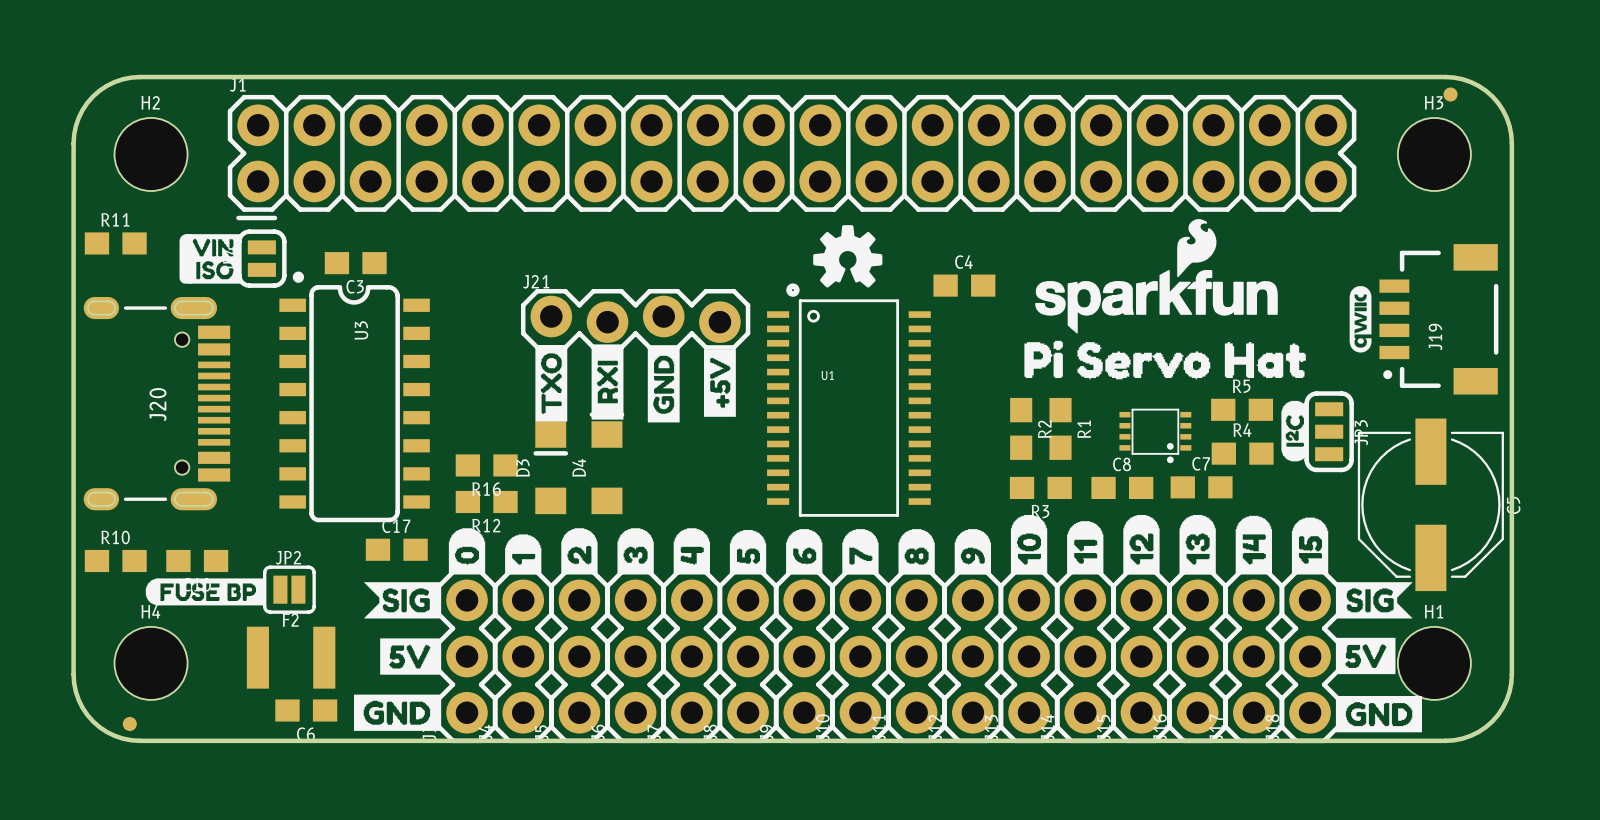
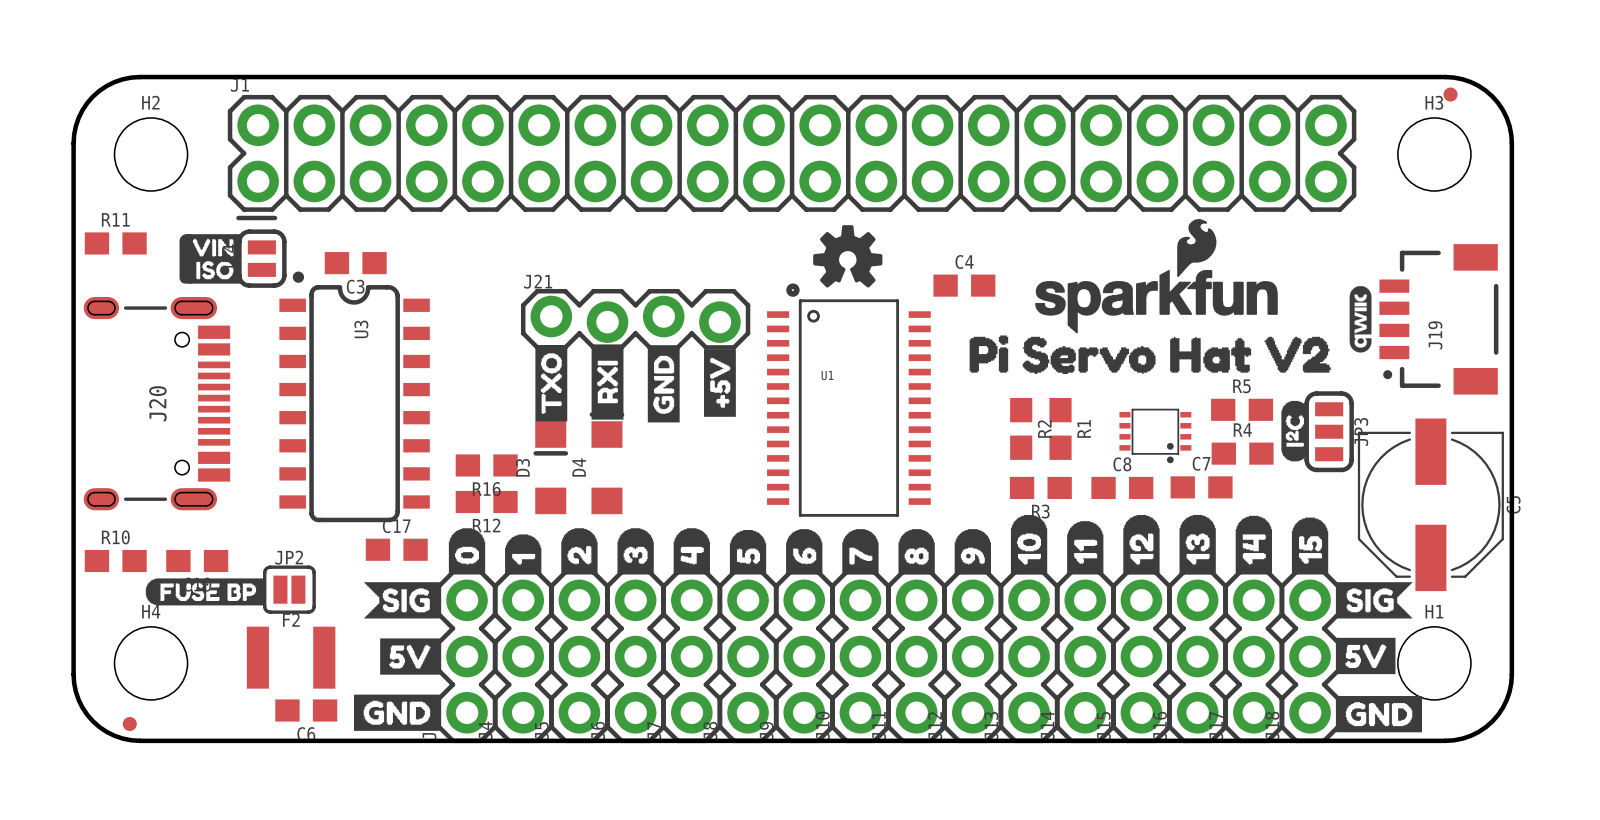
drawing shape: [1024, 340, 1306, 380] -> [969, 335, 1331, 374]

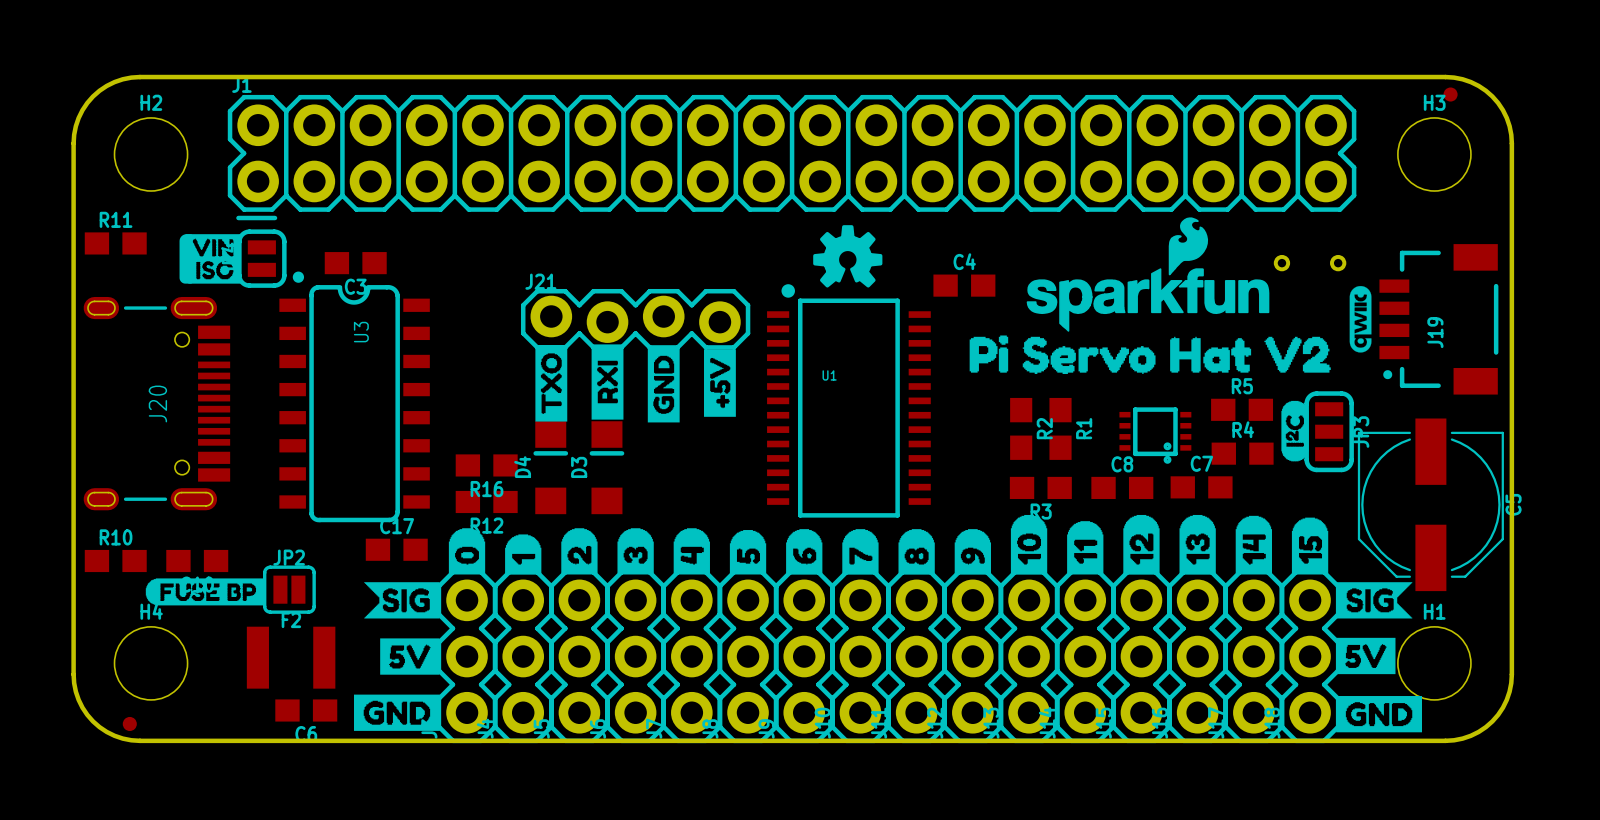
drawing shape: [1035, 219, 1278, 334] -> [1026, 217, 1270, 332]
part: none -> (1281, 263)
part: none -> (1338, 263)
drawing: [786, 283, 800, 297] -> none
U1 footprint: [767, 299, 931, 517] -> [767, 284, 931, 518]
part footprint: [1119, 408, 1192, 464] -> [1119, 407, 1192, 464]
D4: (606, 463) -> none
D3 name: D3 (522, 467) -> D4 (522, 467)
D3: none -> (606, 467)

